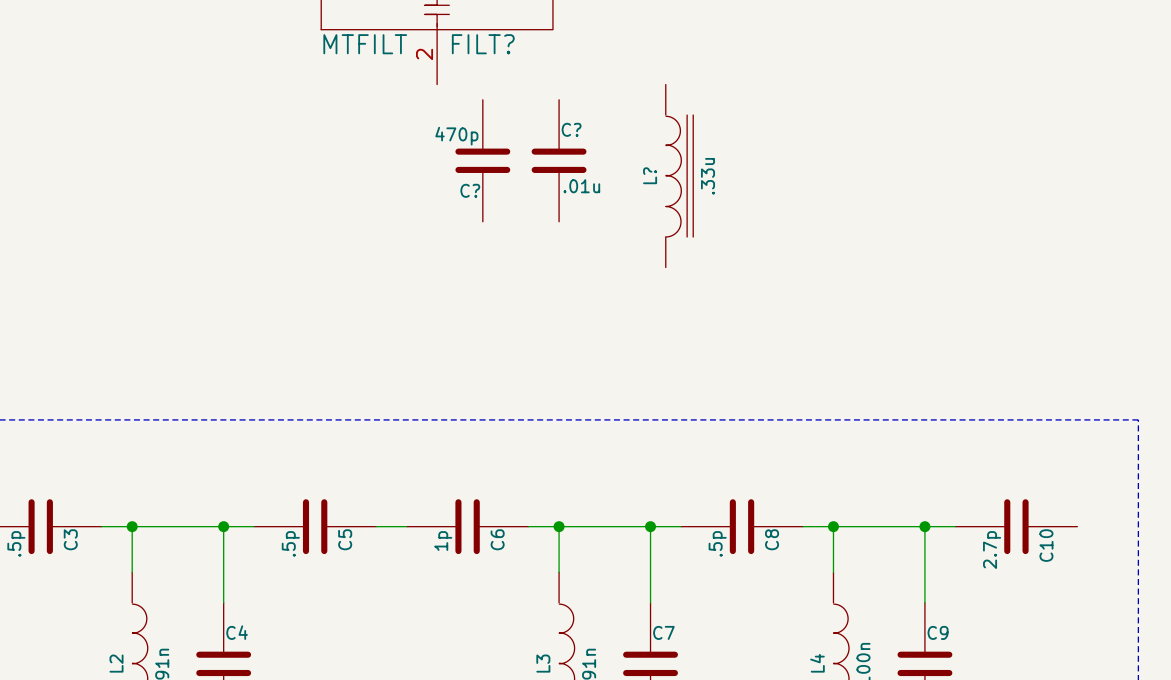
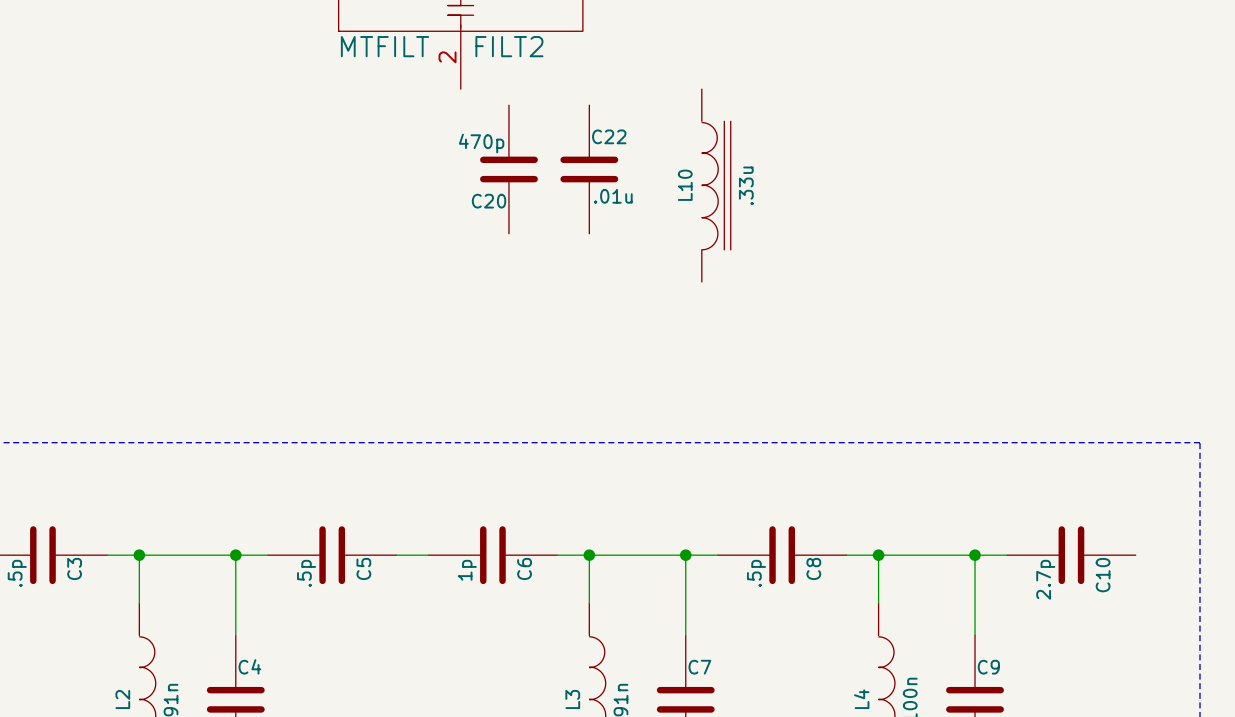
FILT? name: FILT? (483, 44) -> FILT2 (509, 46)
C? name: C? (571, 129) -> C22 (609, 136)
L? name: L? (650, 175) -> L10 (685, 185)
C? name: C? (470, 190) -> C20 (489, 201)

